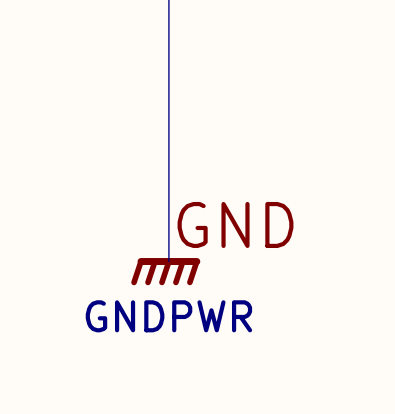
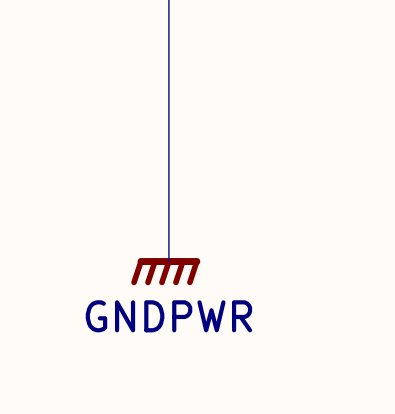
label: GND (235, 224) -> none

